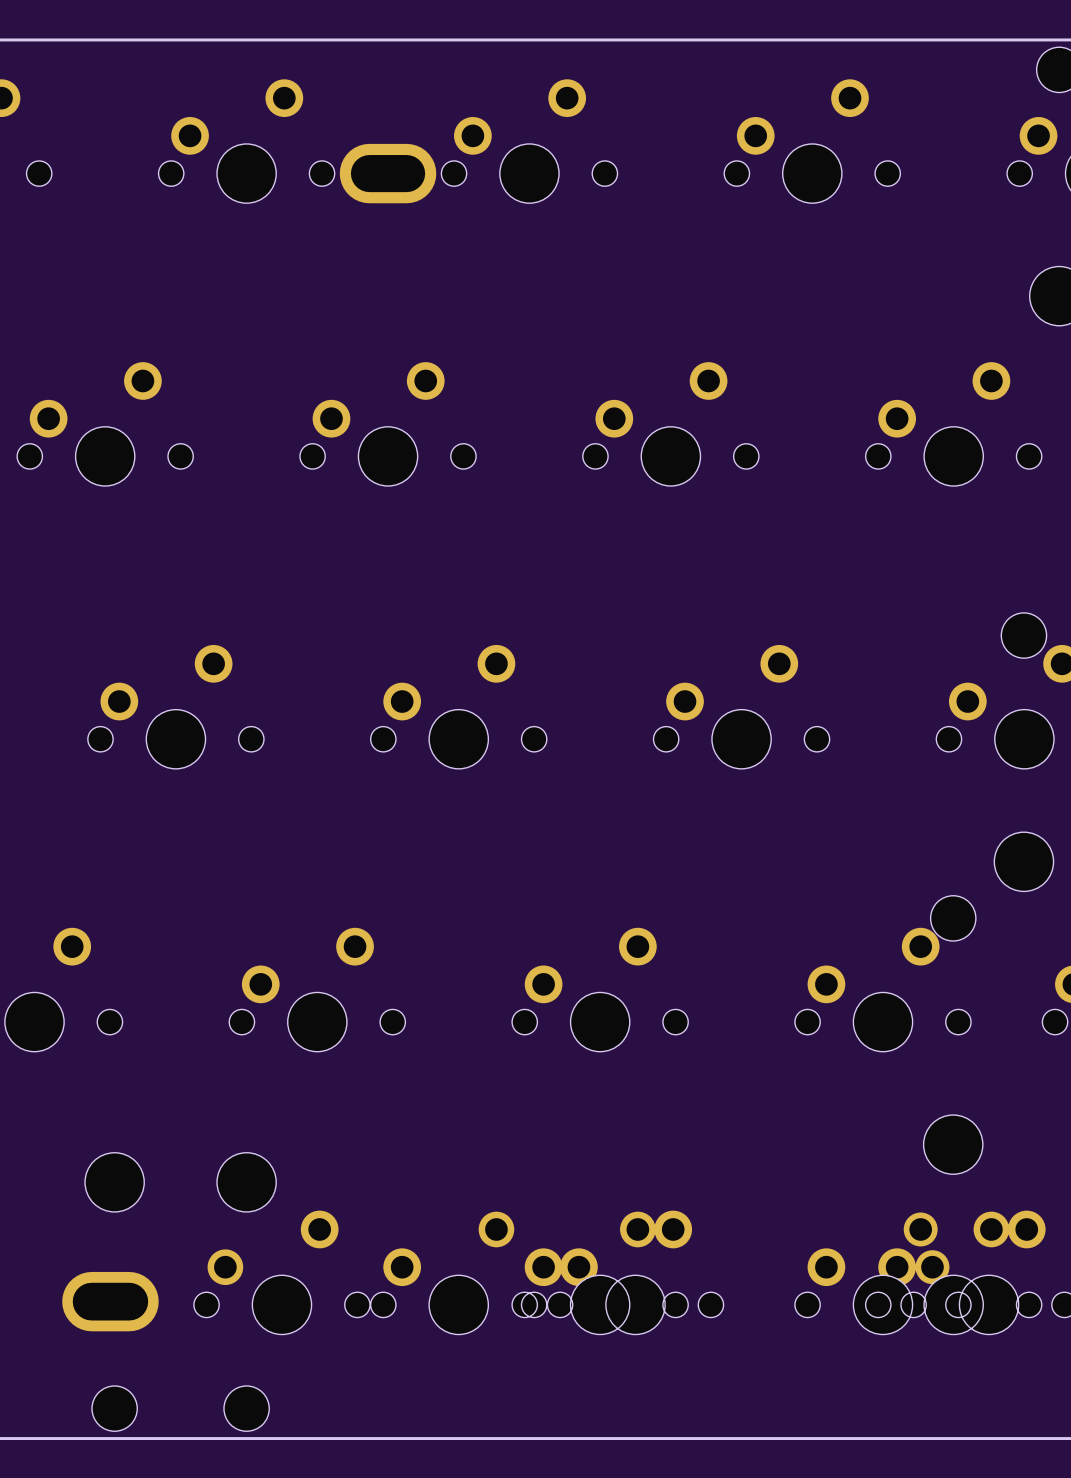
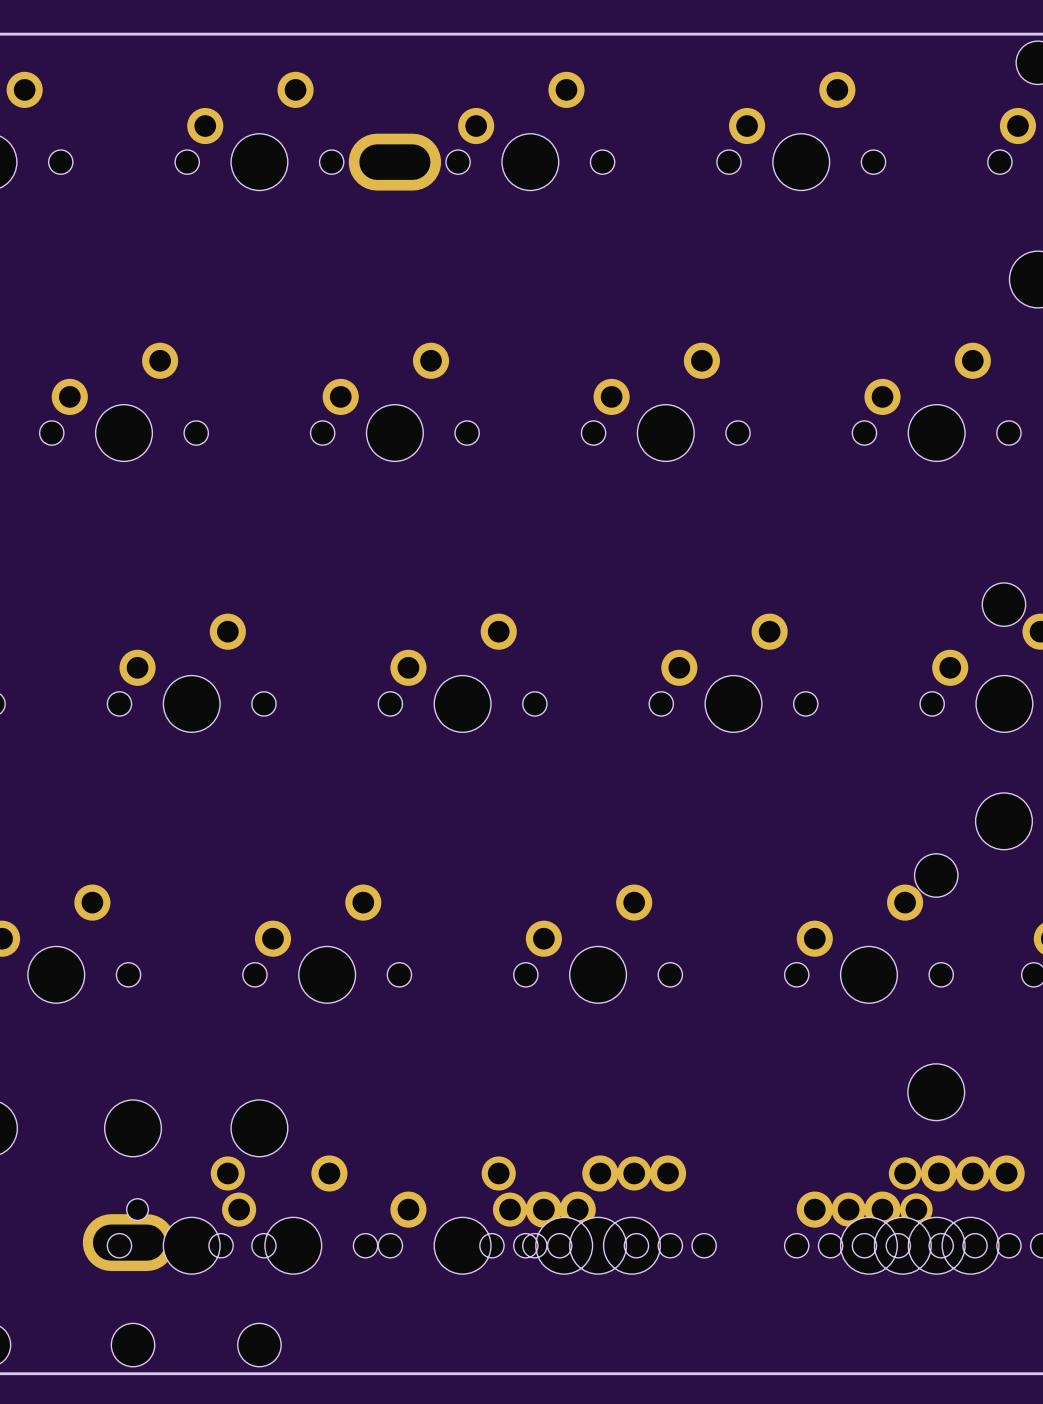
part: none -> (564, 1214)
part: none -> (902, 1214)
part: none -> (191, 1215)

